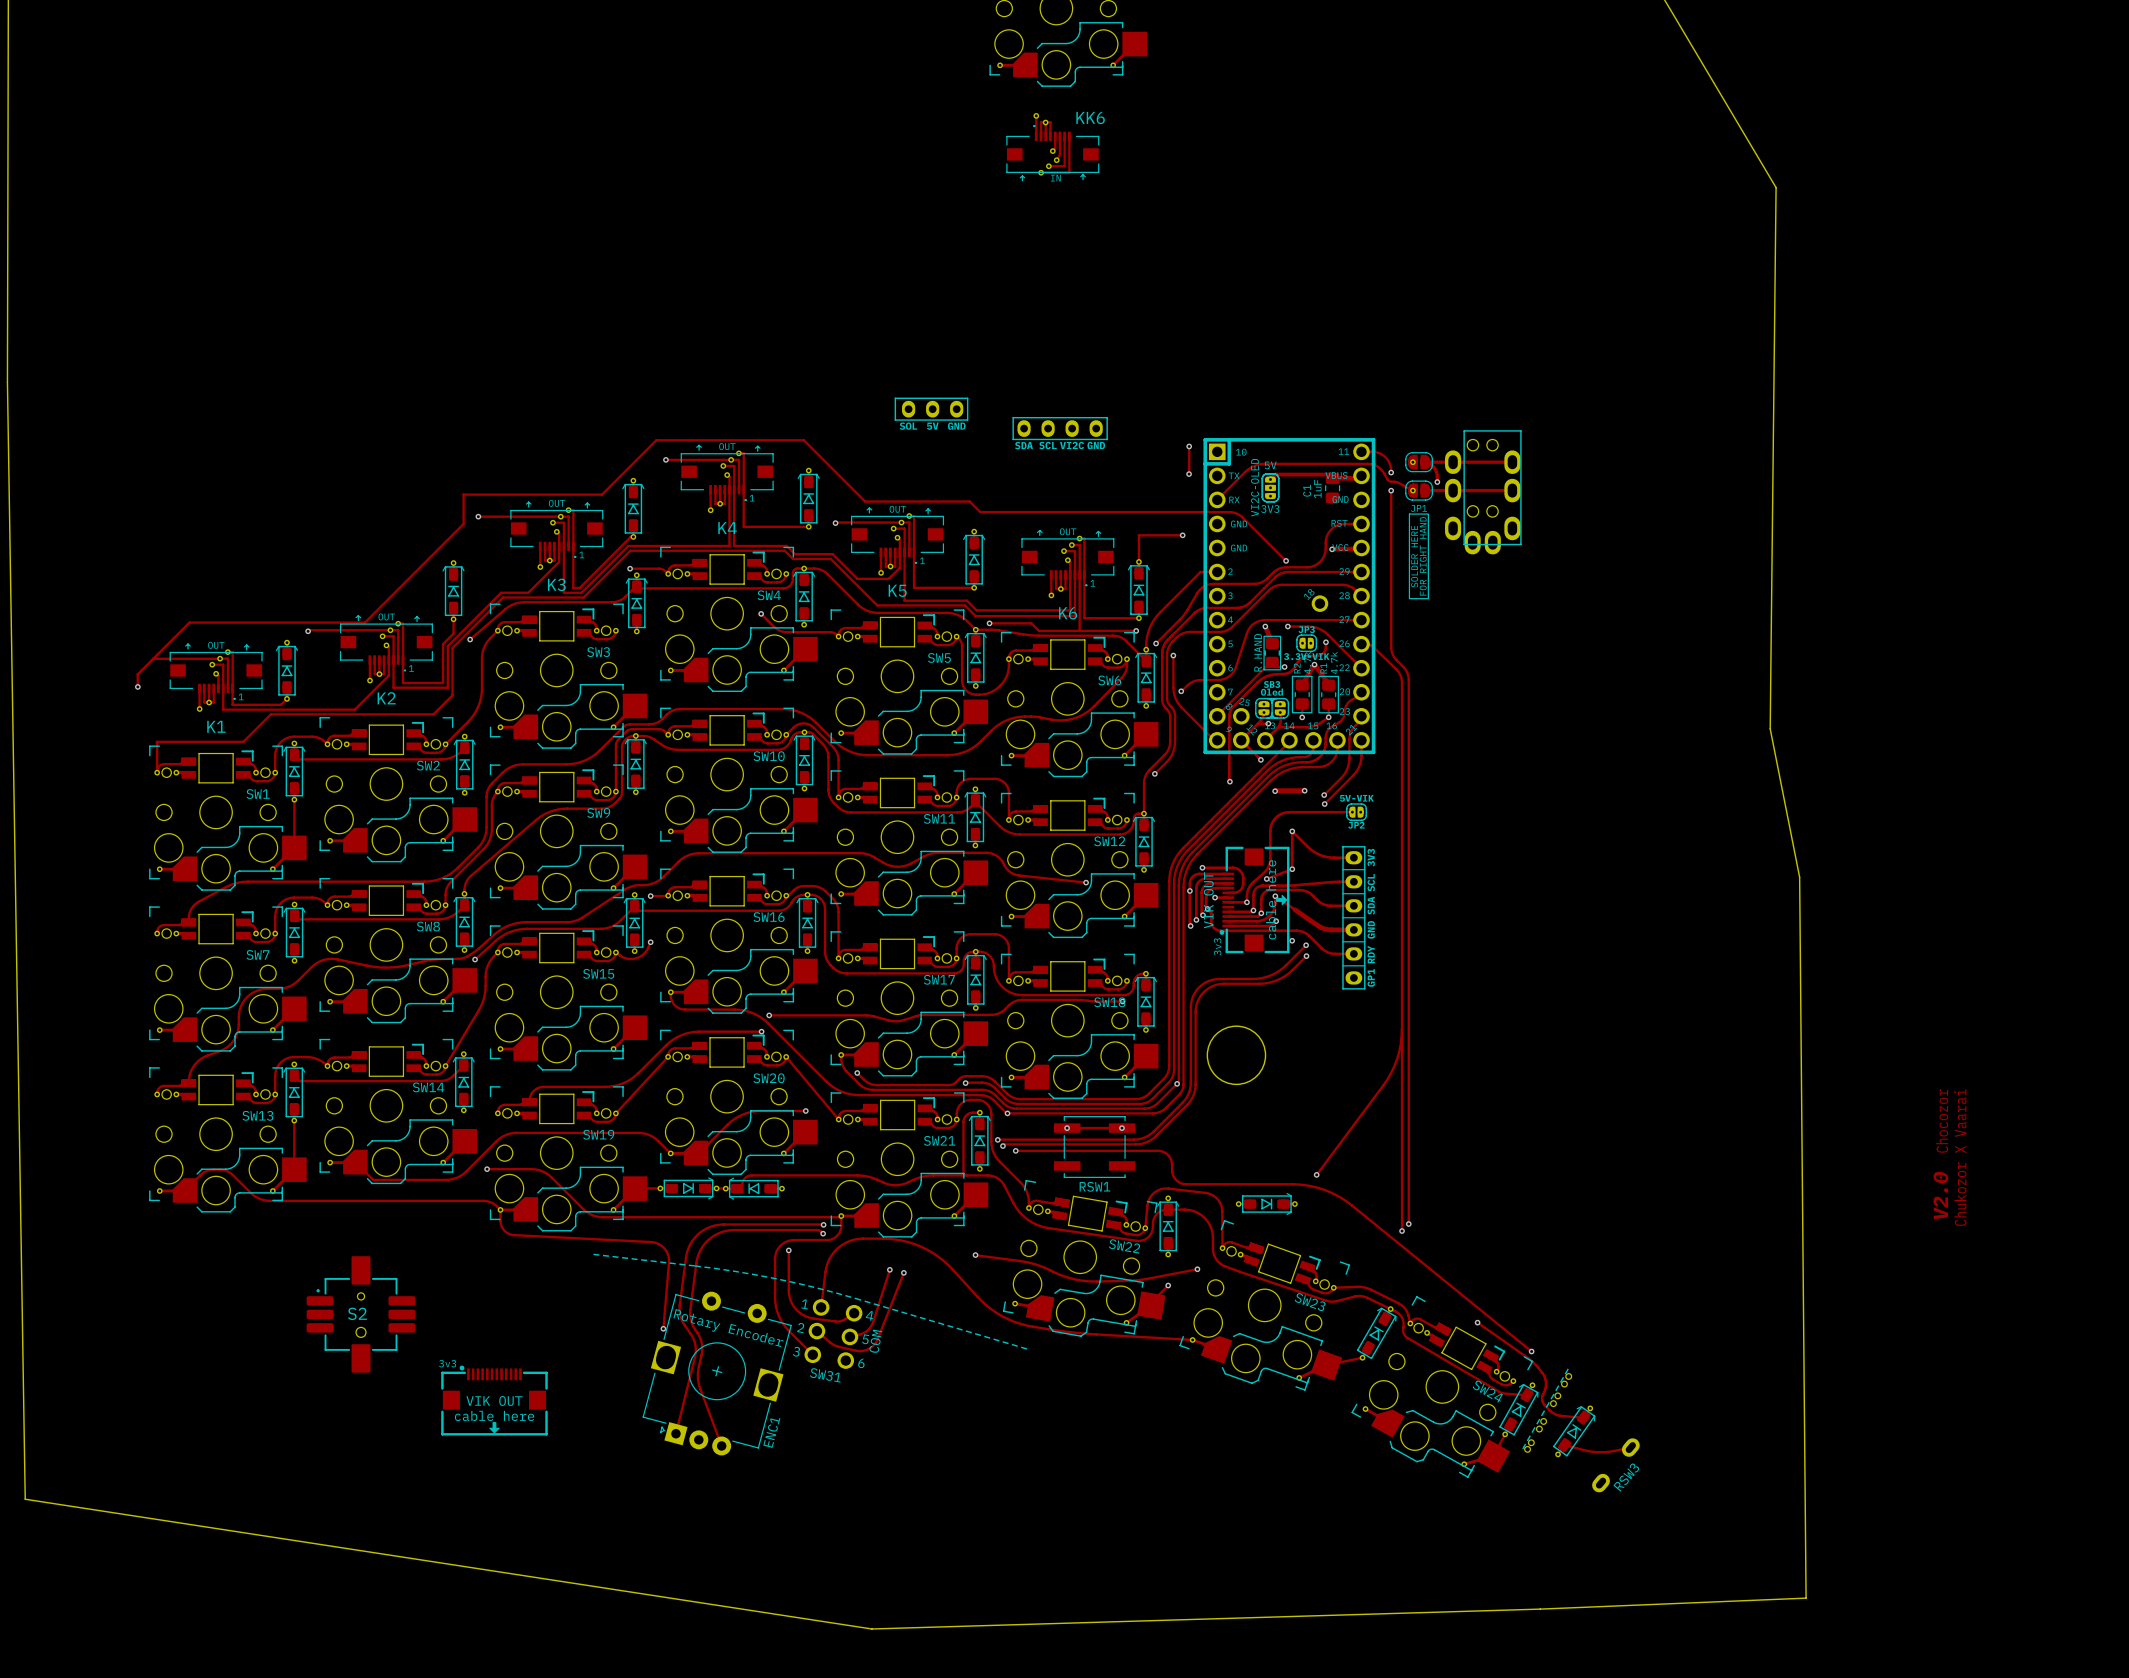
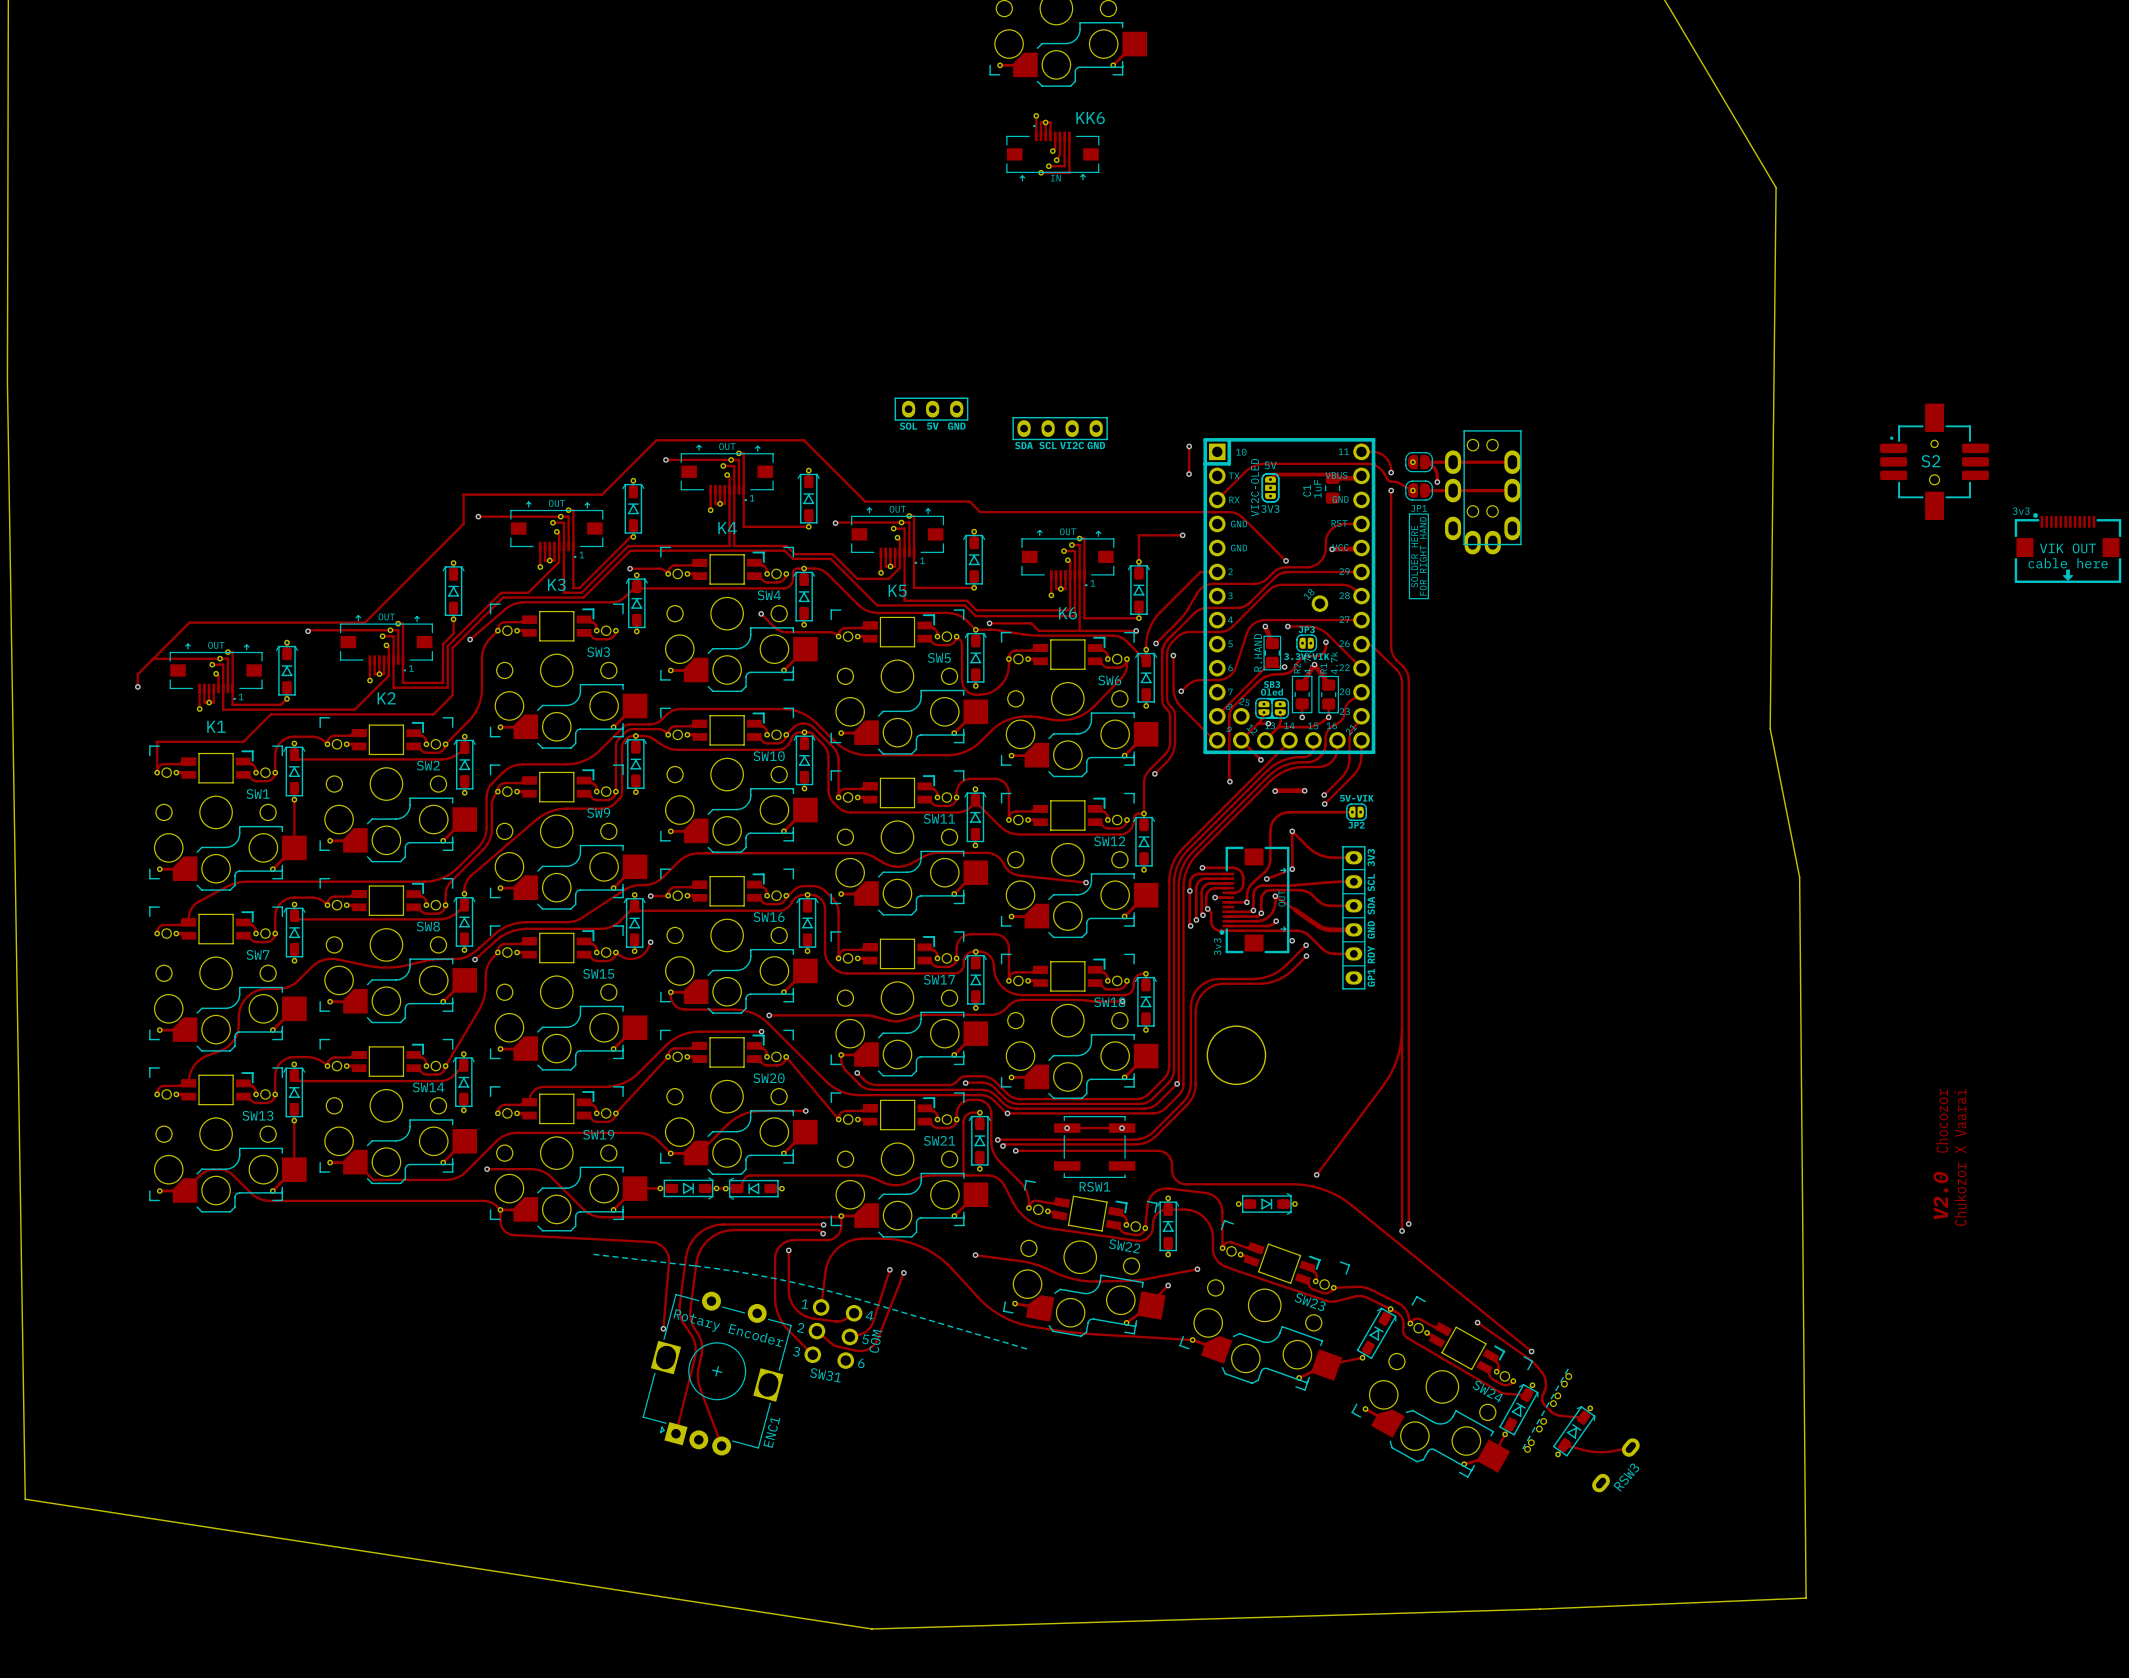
part: none -> (2067, 548)
part footprint: [1219, 846, 1290, 954] -> [1219, 846, 1290, 954]
S2 position: (361, 1314) -> (1934, 461)
part: (494, 1400) -> none

